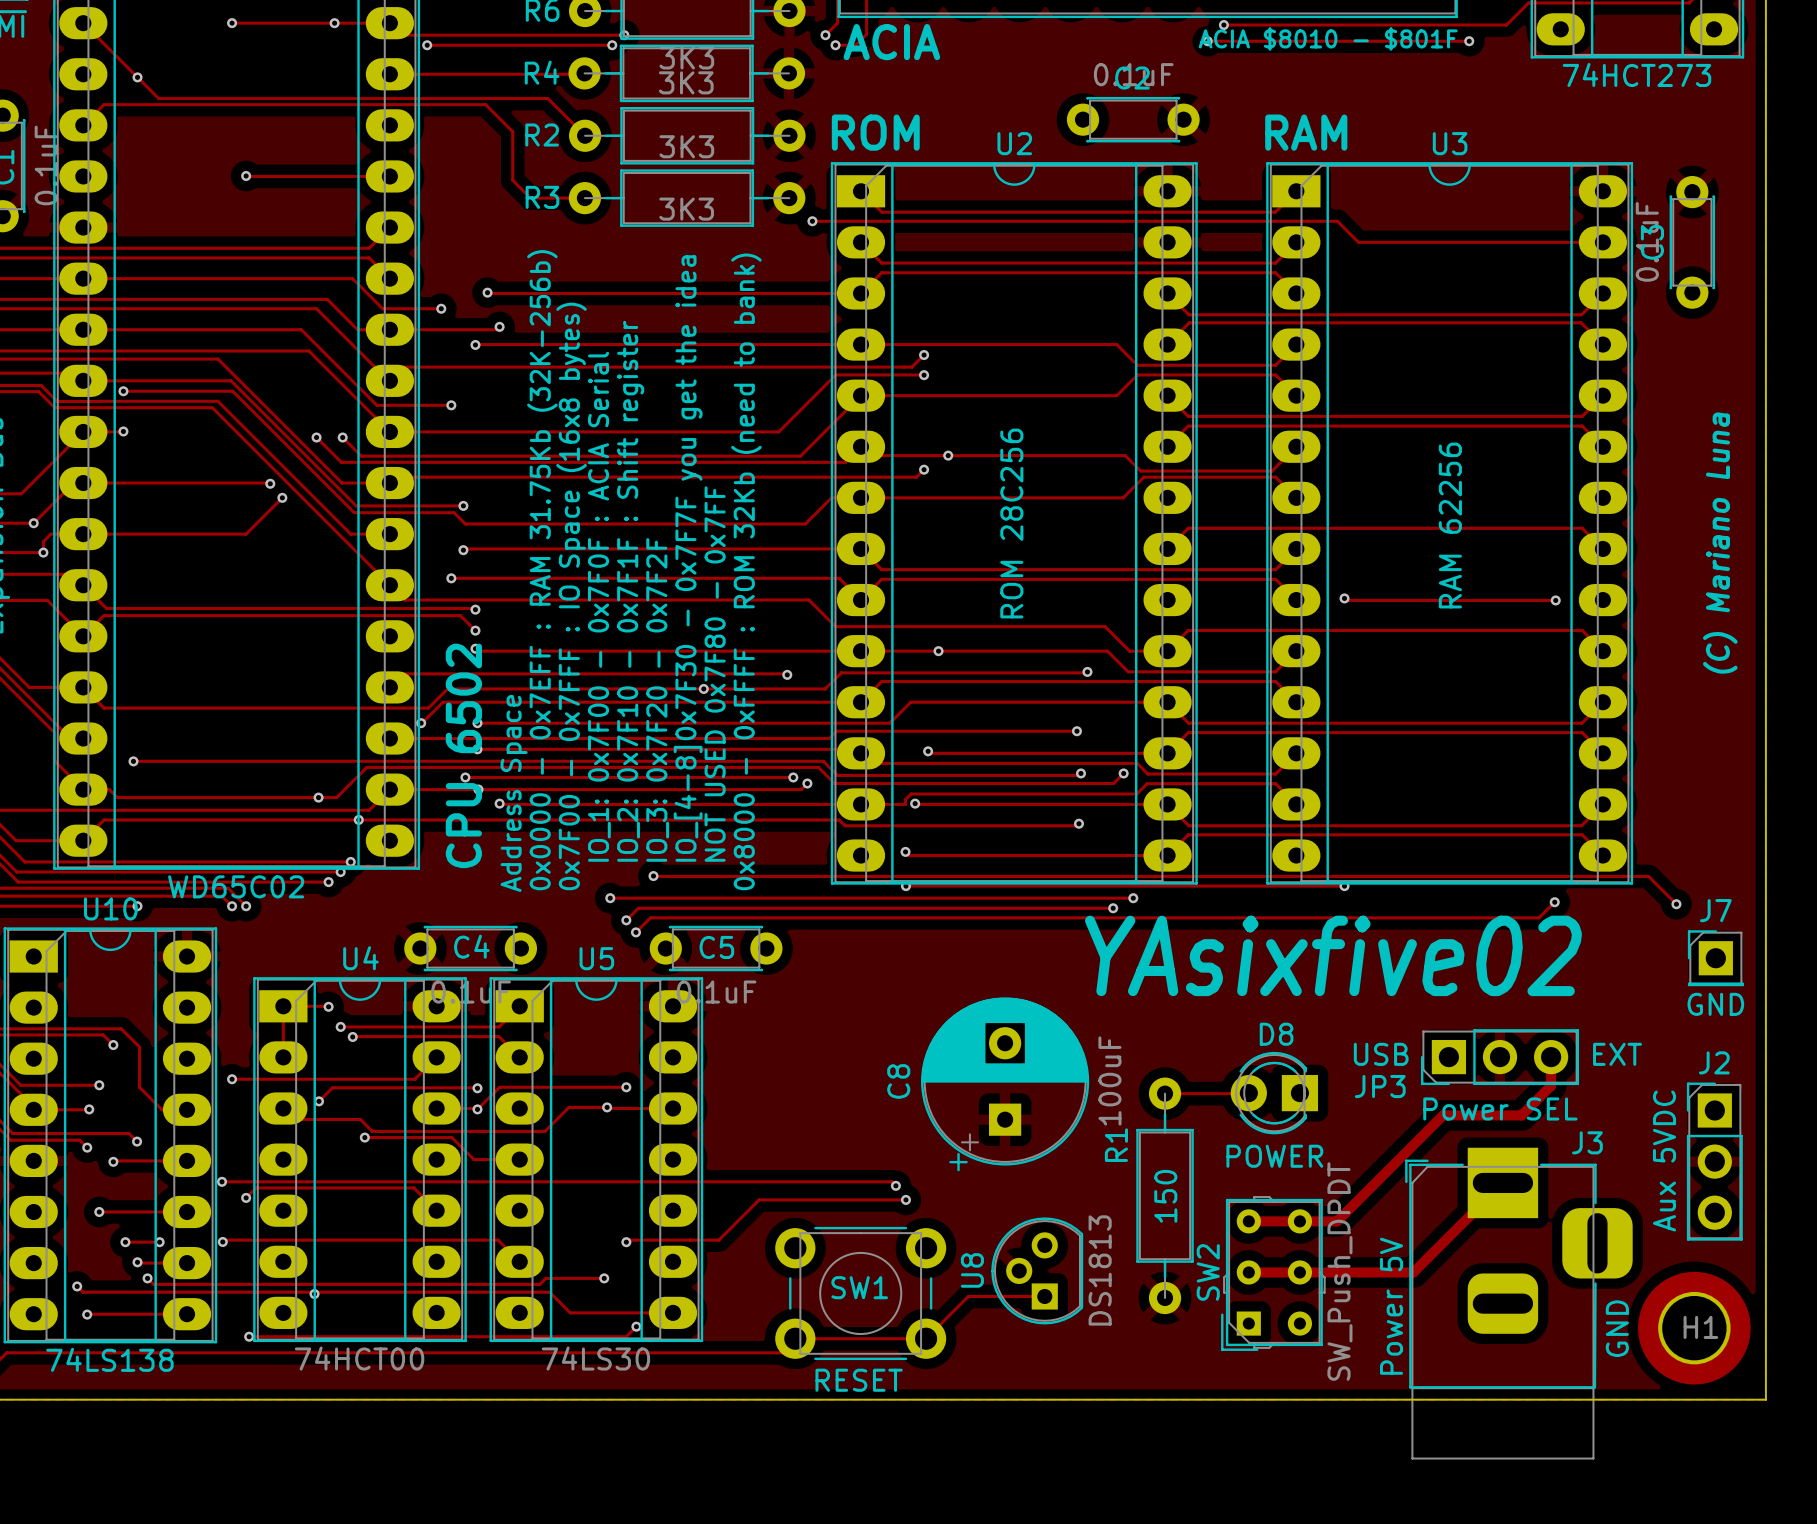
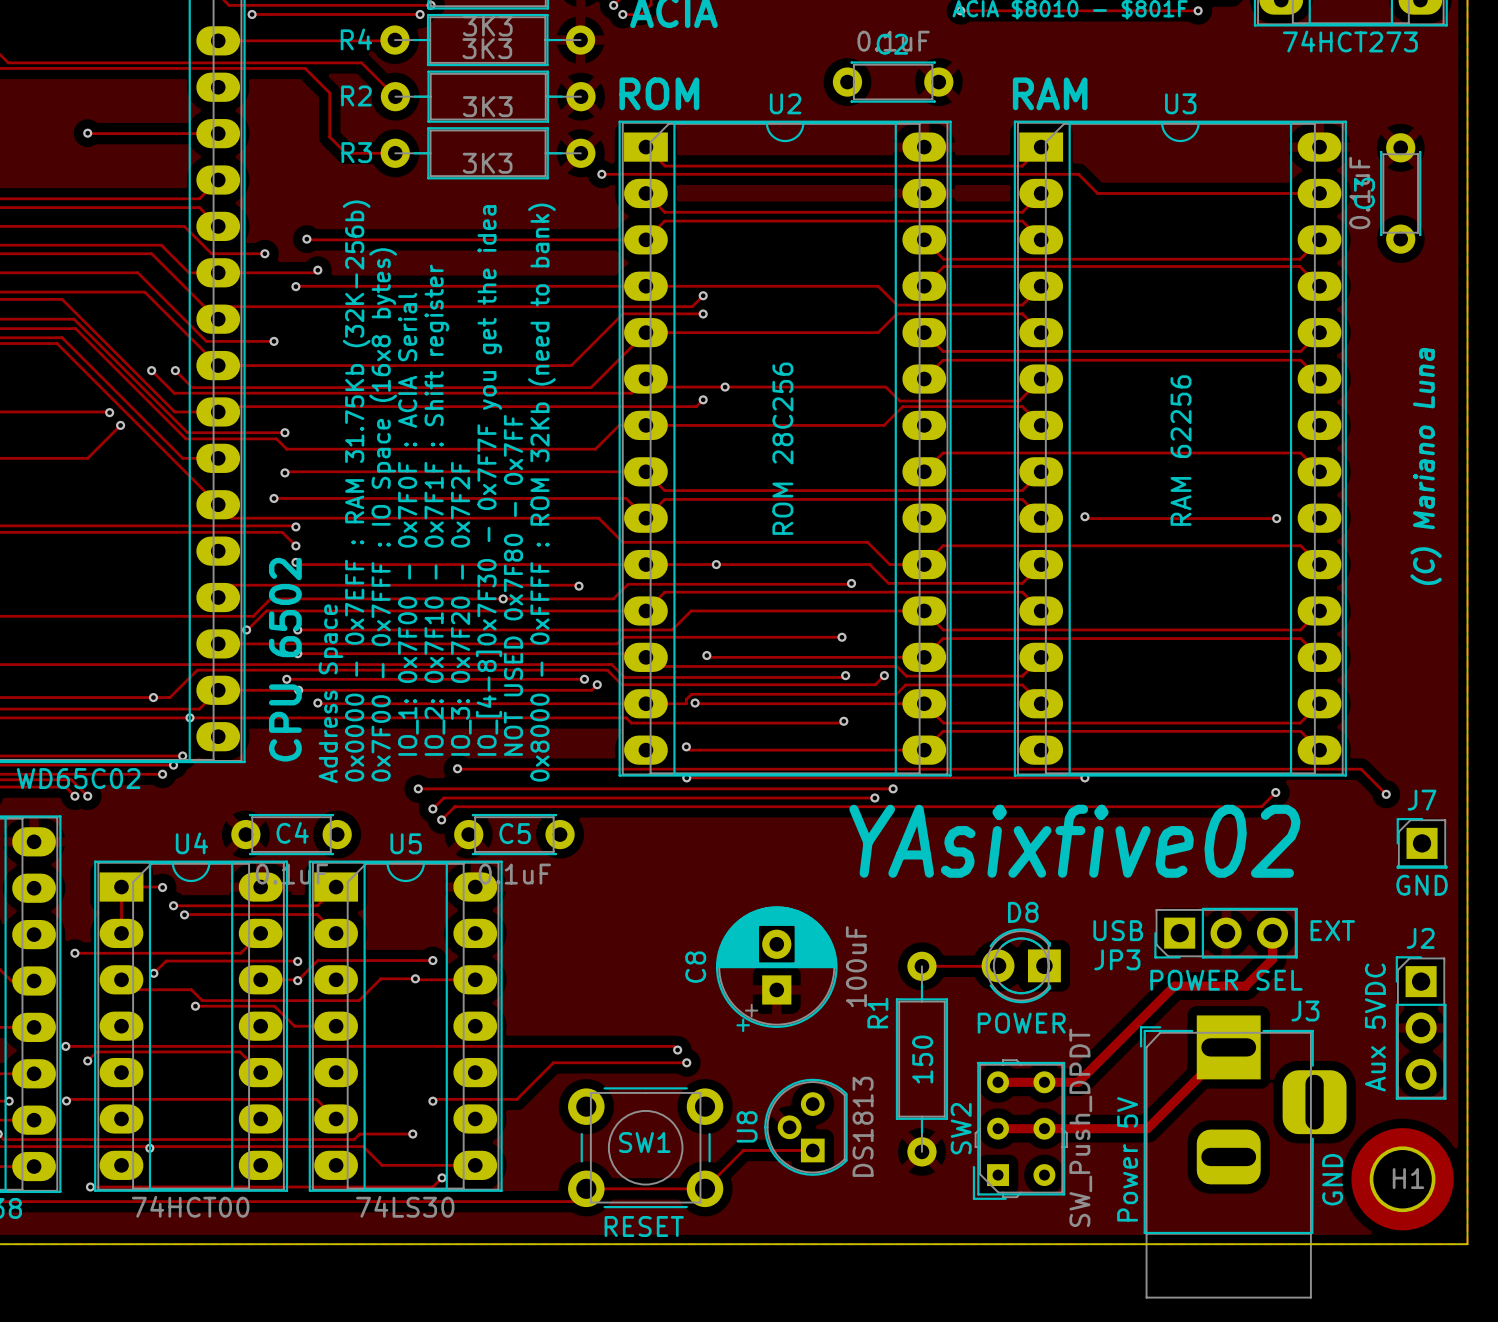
C8 footprint: [921, 997, 1090, 1172] -> [715, 906, 838, 1033]
JP3 value: Power SEL (1500, 1108) -> POWER SEL (1226, 980)

